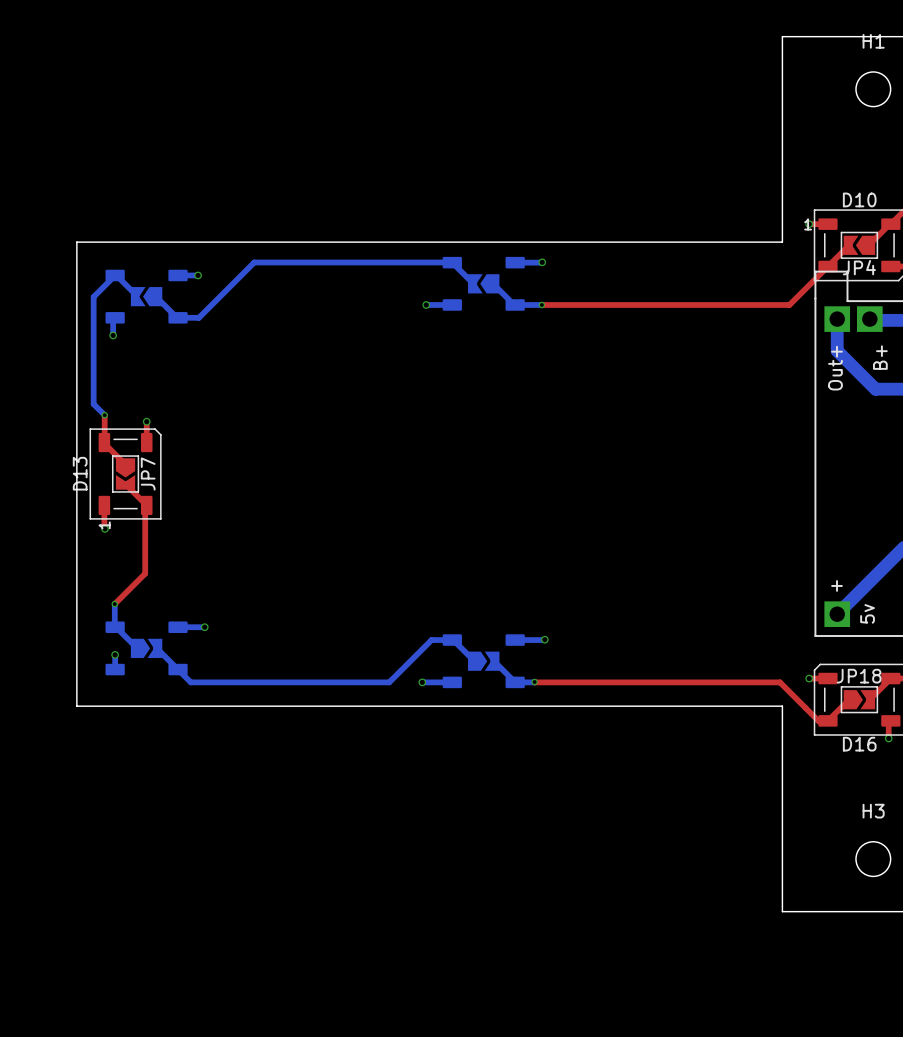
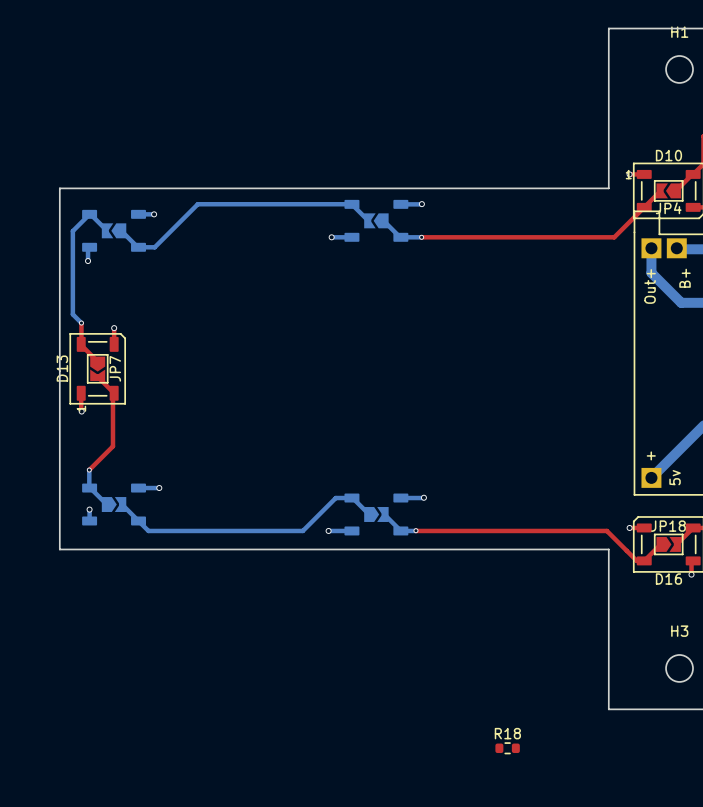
R18: none -> (507, 748)

